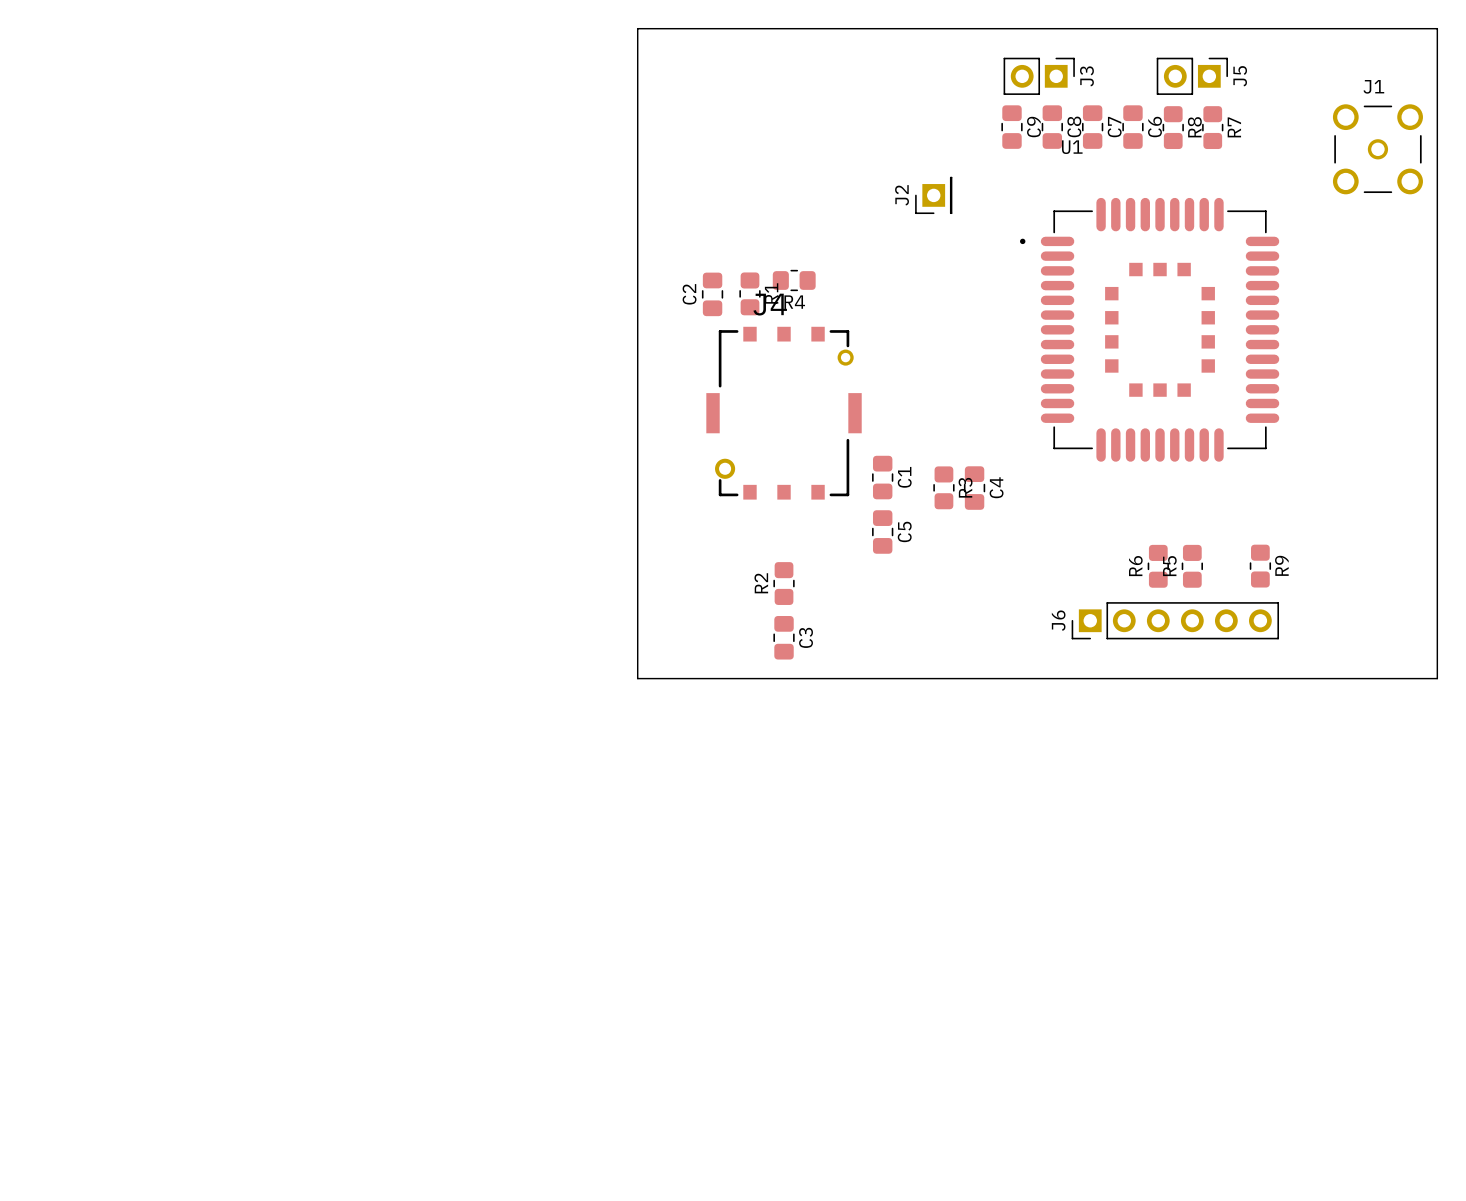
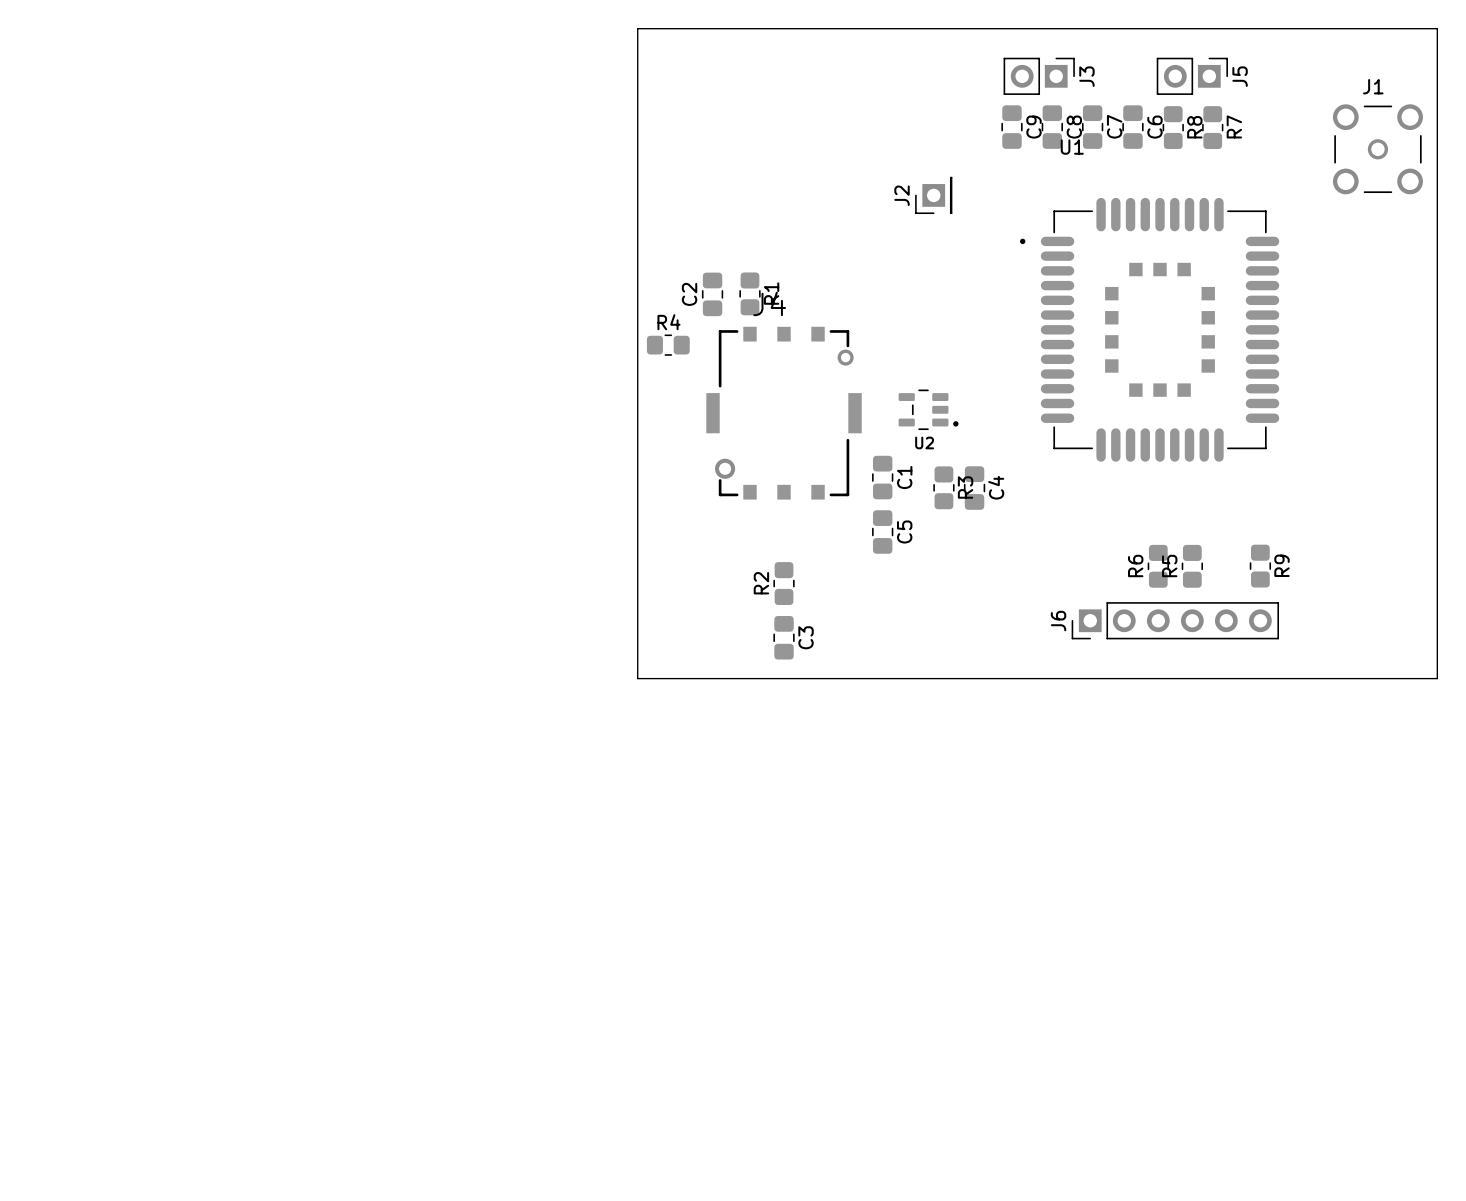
R4 position: (794, 280) -> (668, 345)
R4 name position: R4 (794, 302) -> R4 (668, 322)
U2: none -> (928, 409)

